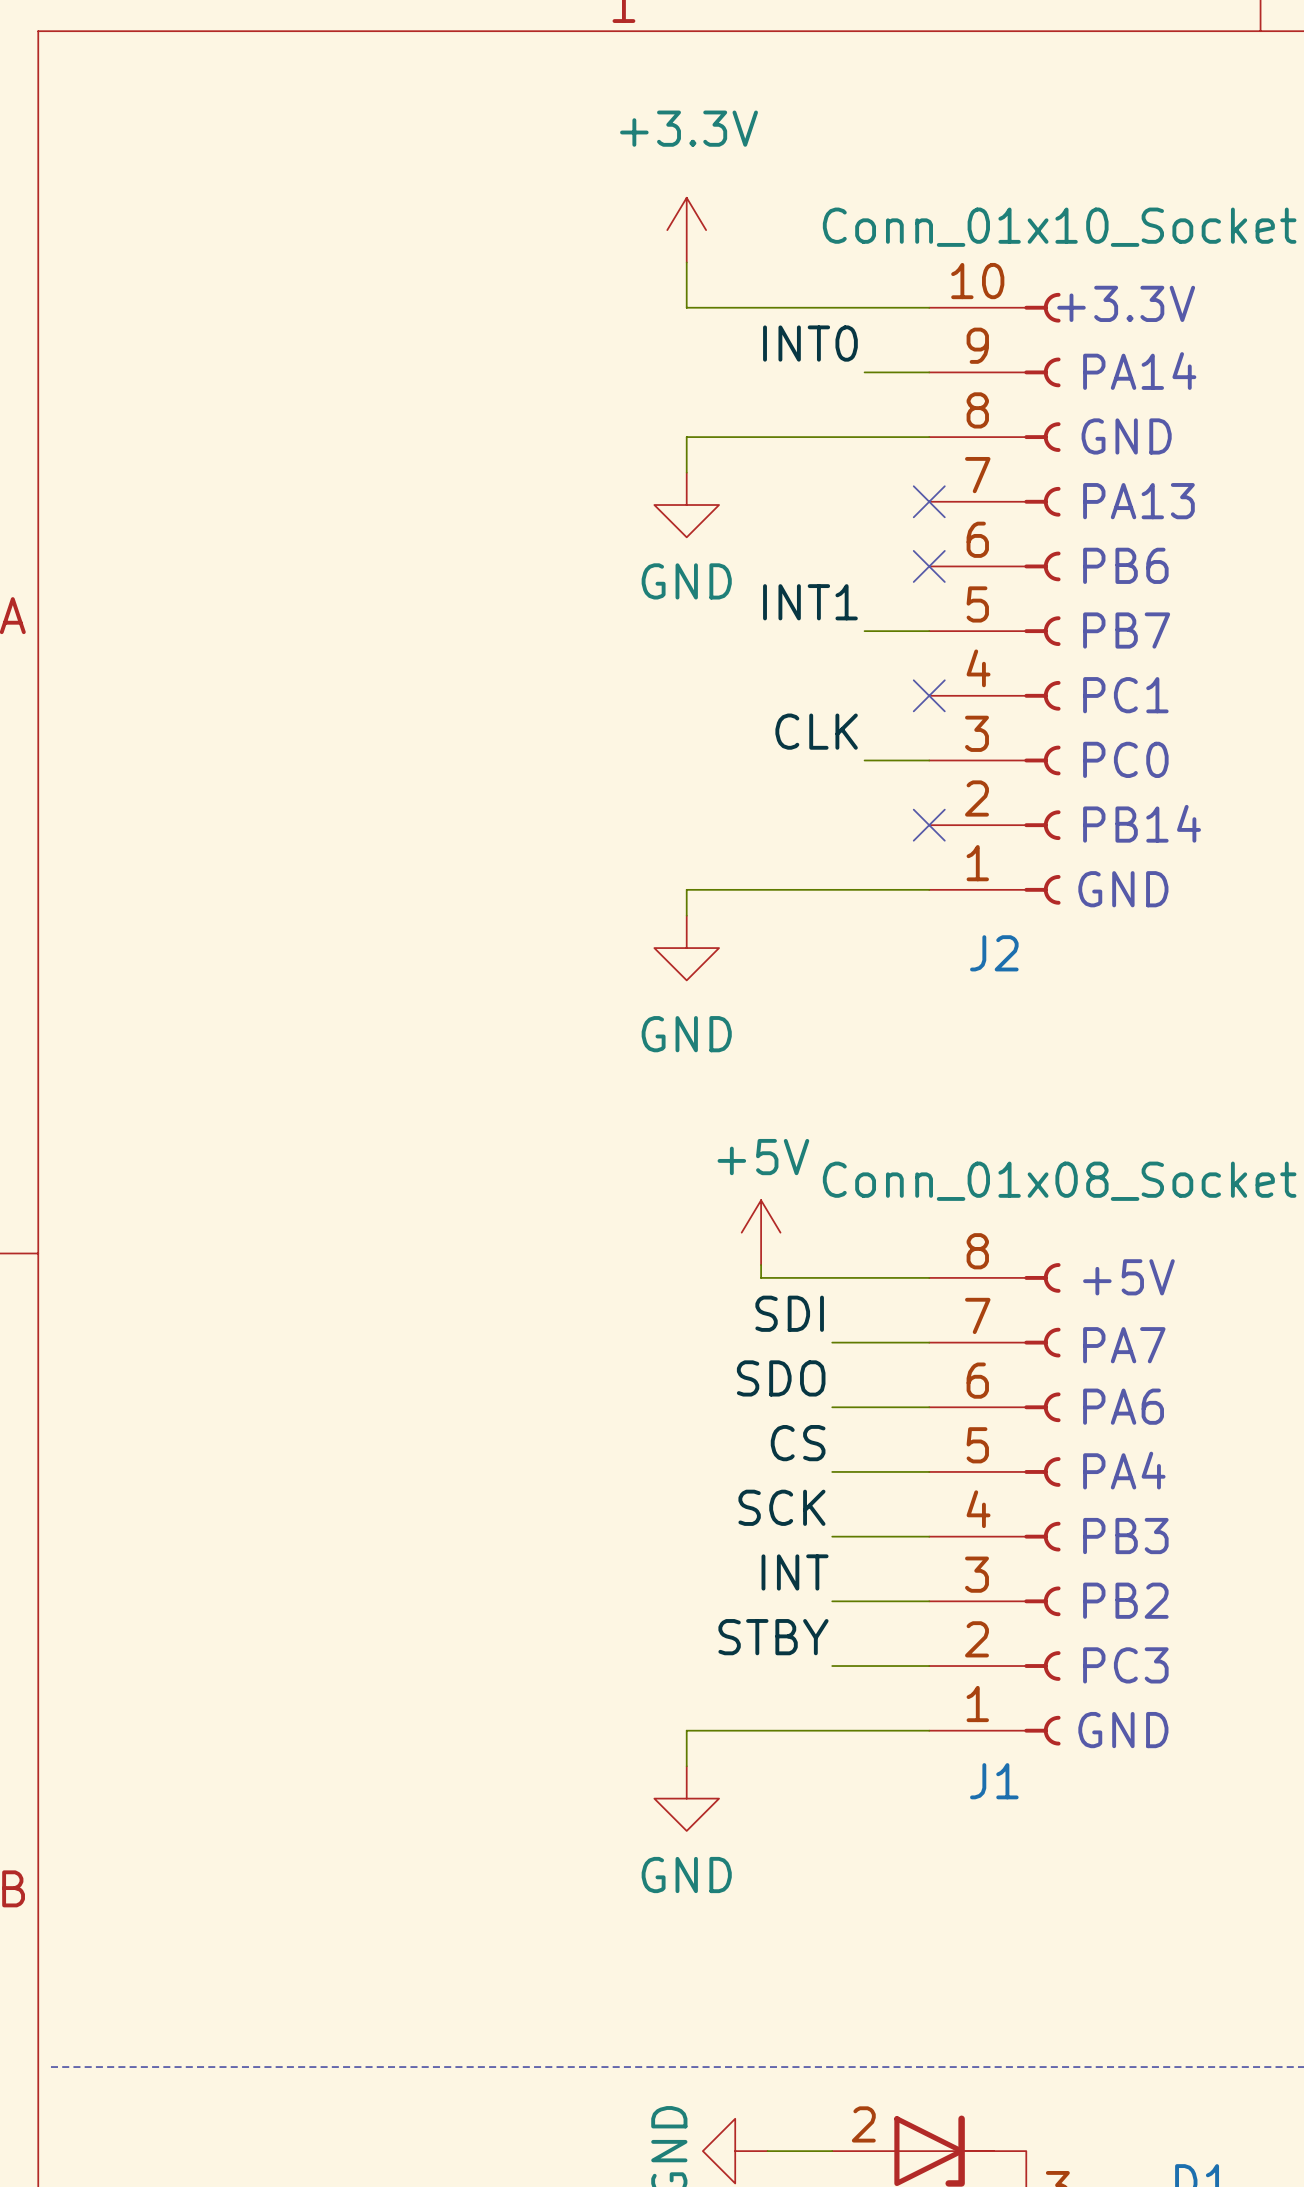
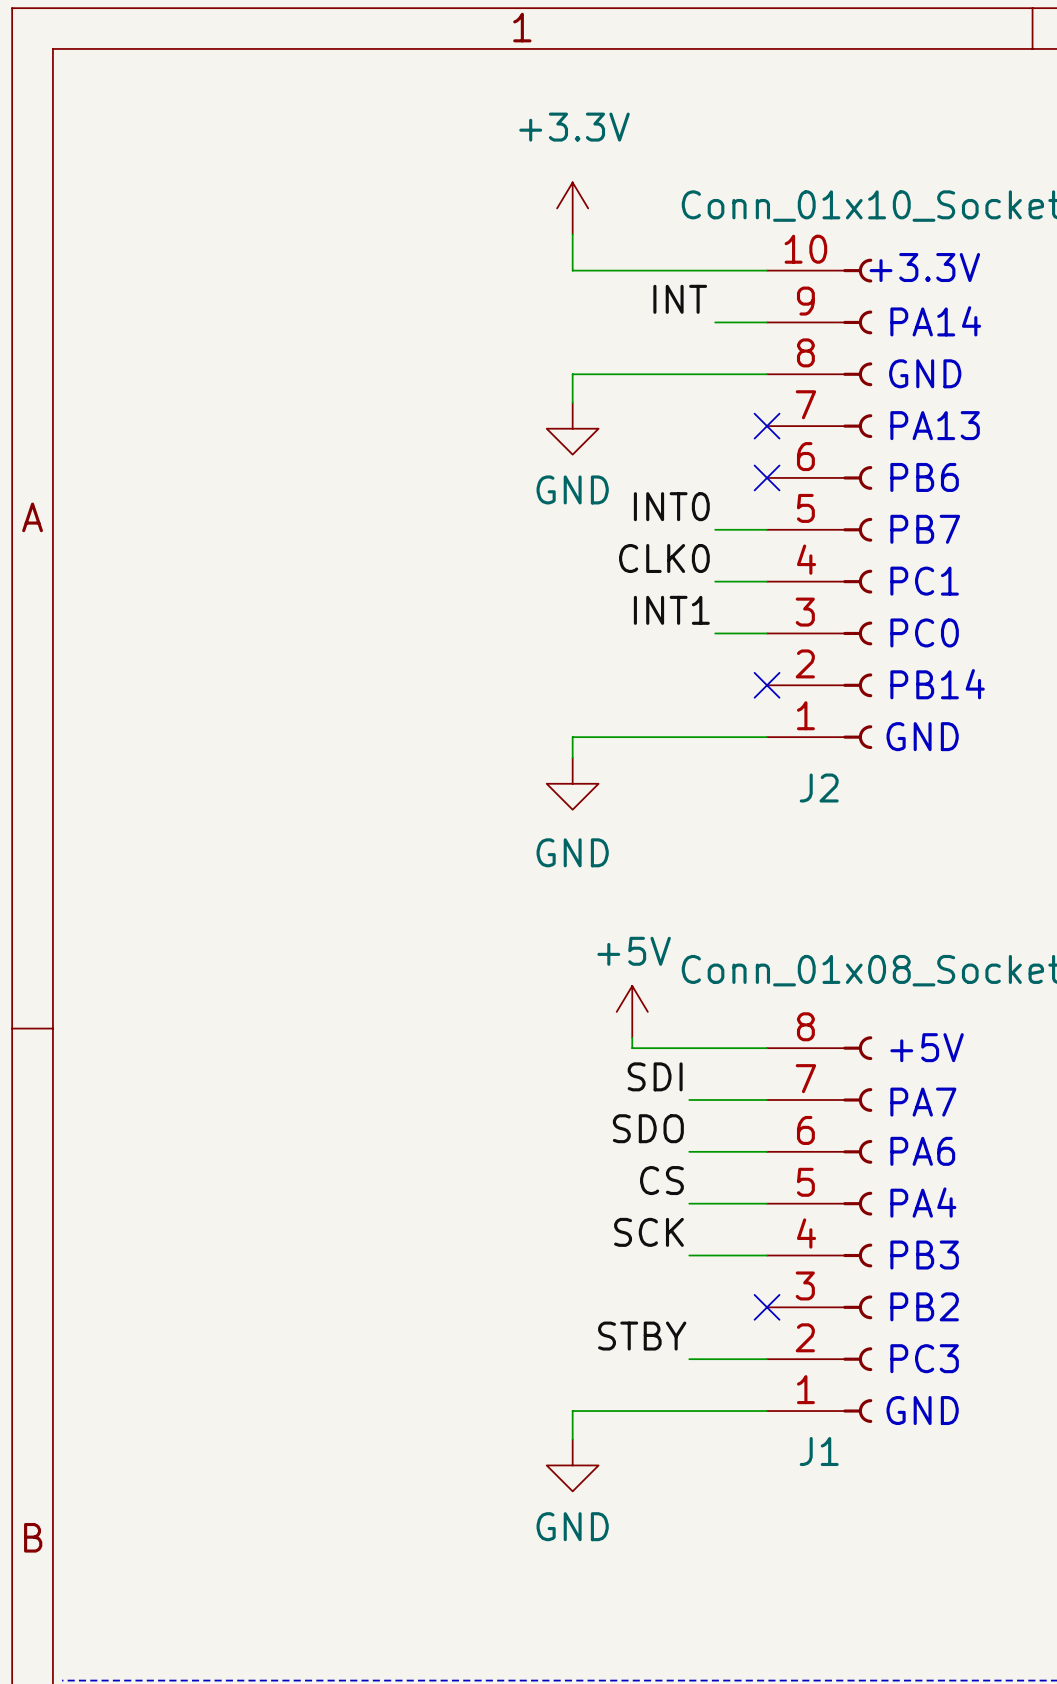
label: INT0 (810, 343) -> INT (680, 299)
label: INT1 (810, 602) -> INT0 (671, 506)
label: none -> CLK0 (664, 558)
wire: none -> (715, 581) (767, 581)
no-connect mark: (929, 695) -> none
label: CLK (816, 731) -> INT1 (671, 610)
label: INT (795, 1572) -> none
wire: (832, 1601) (929, 1601) -> none
no-connect mark: none -> (767, 1307)

